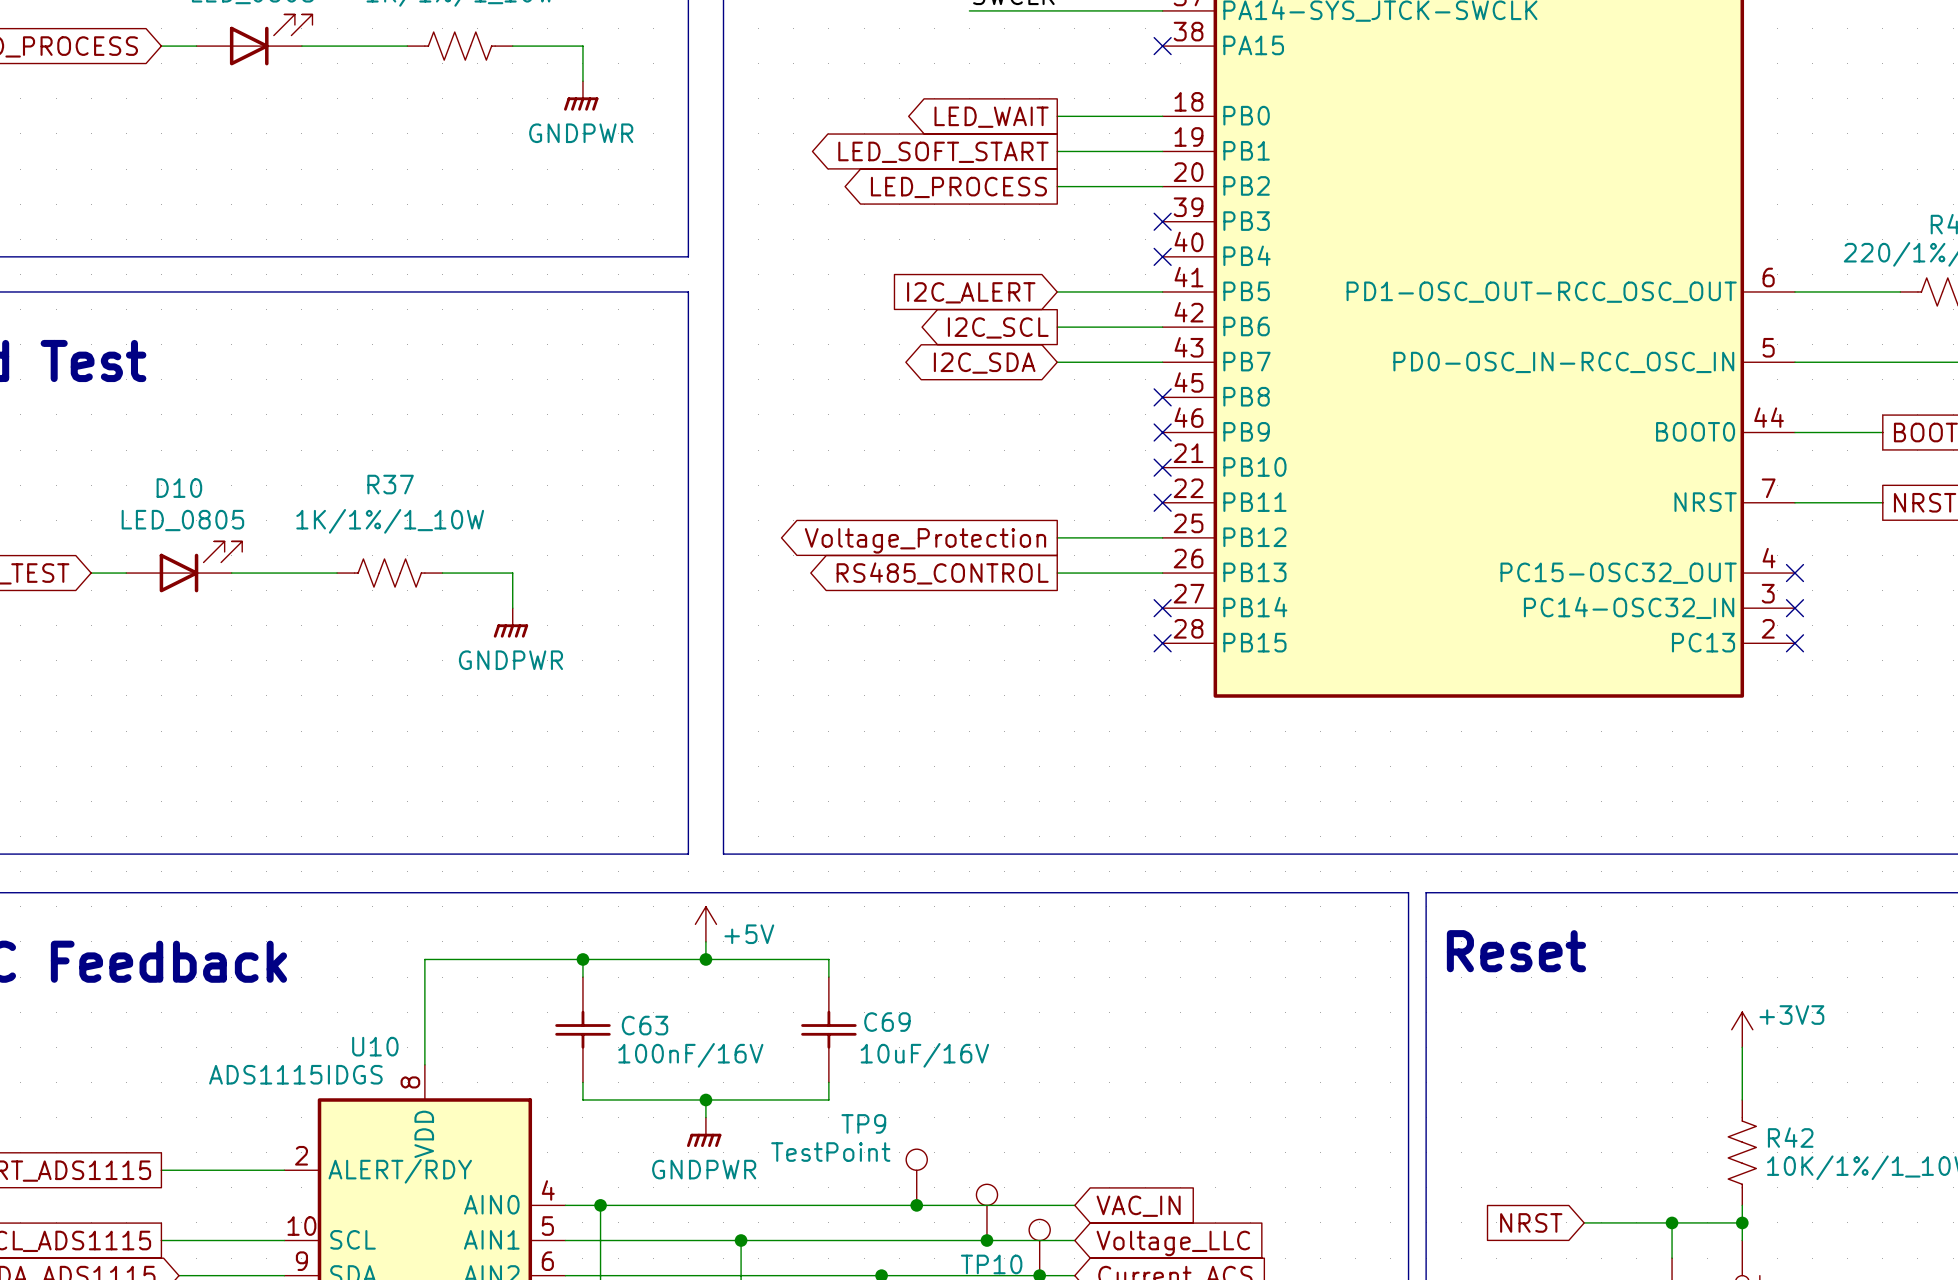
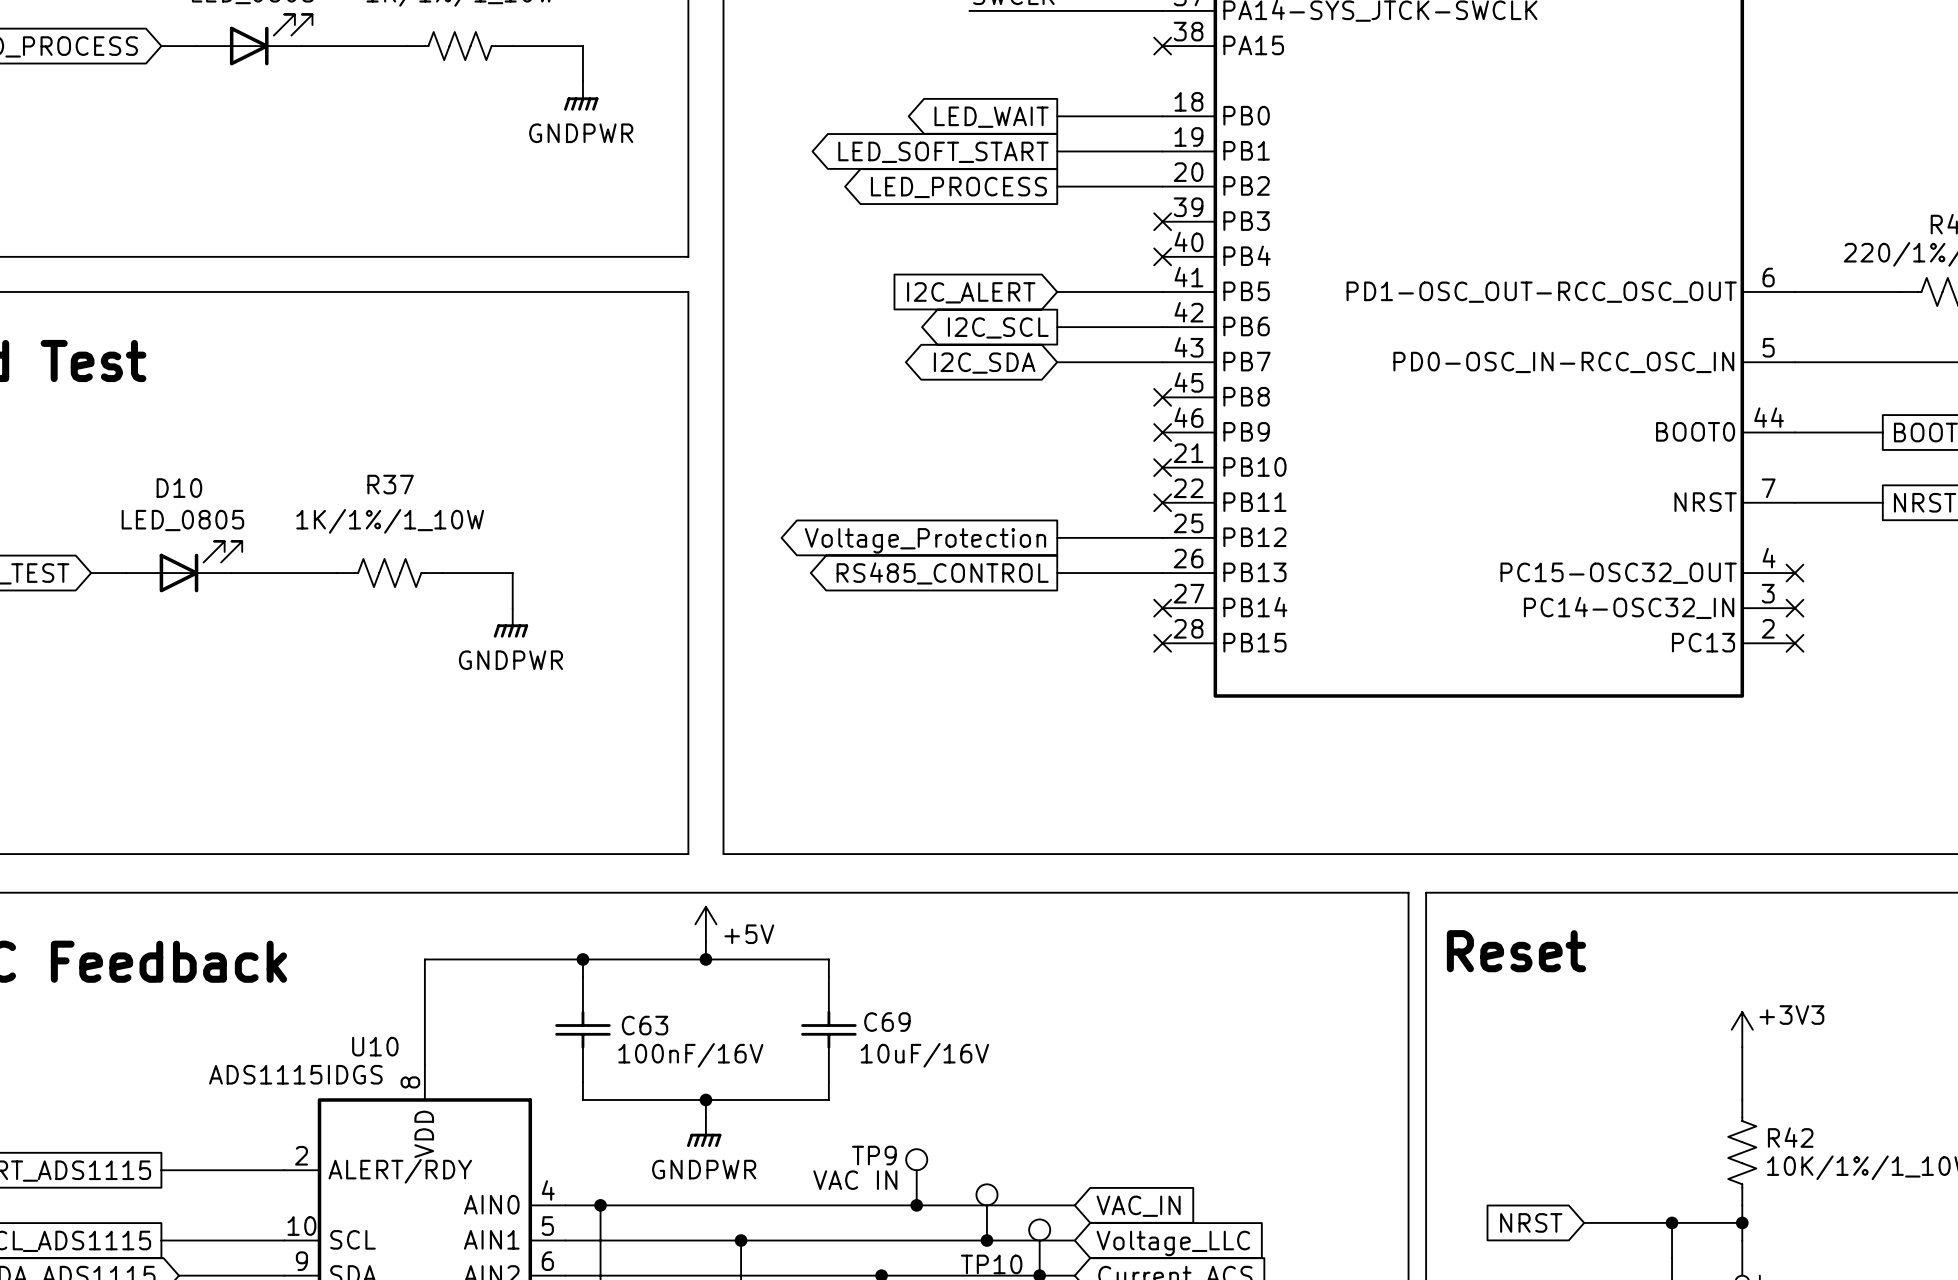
TP9 name position: TP9 (863, 1123) -> TP9 (874, 1155)
TP9 value: TestPoint (830, 1152) -> VAC IN (855, 1180)

